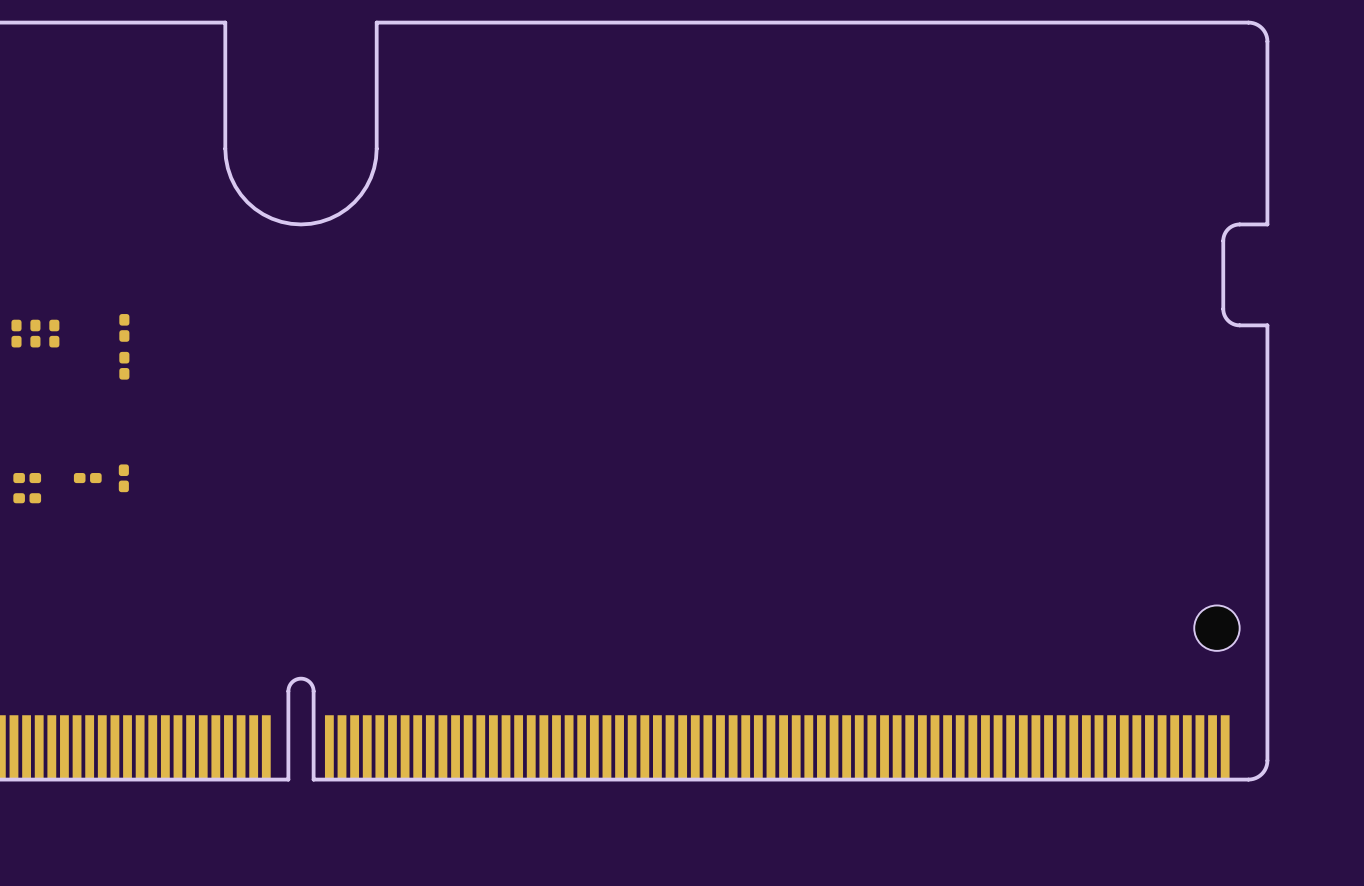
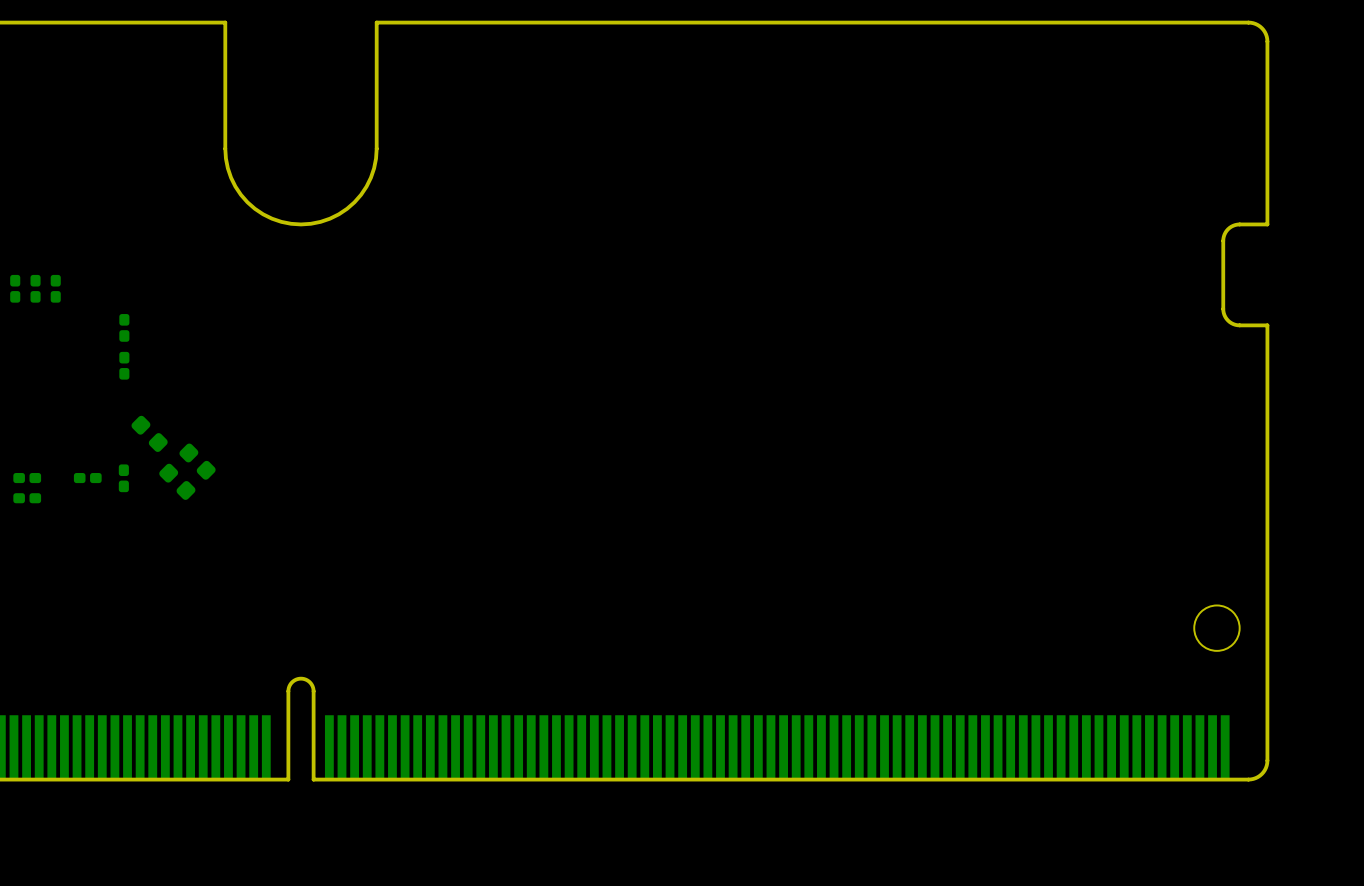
part: none -> (15, 288)
part: none -> (35, 288)
part: none -> (55, 288)
part: (16, 333) -> none
part: (35, 333) -> none
part: (54, 333) -> none
part: none -> (149, 433)
part: none -> (197, 461)
part: none -> (177, 481)

